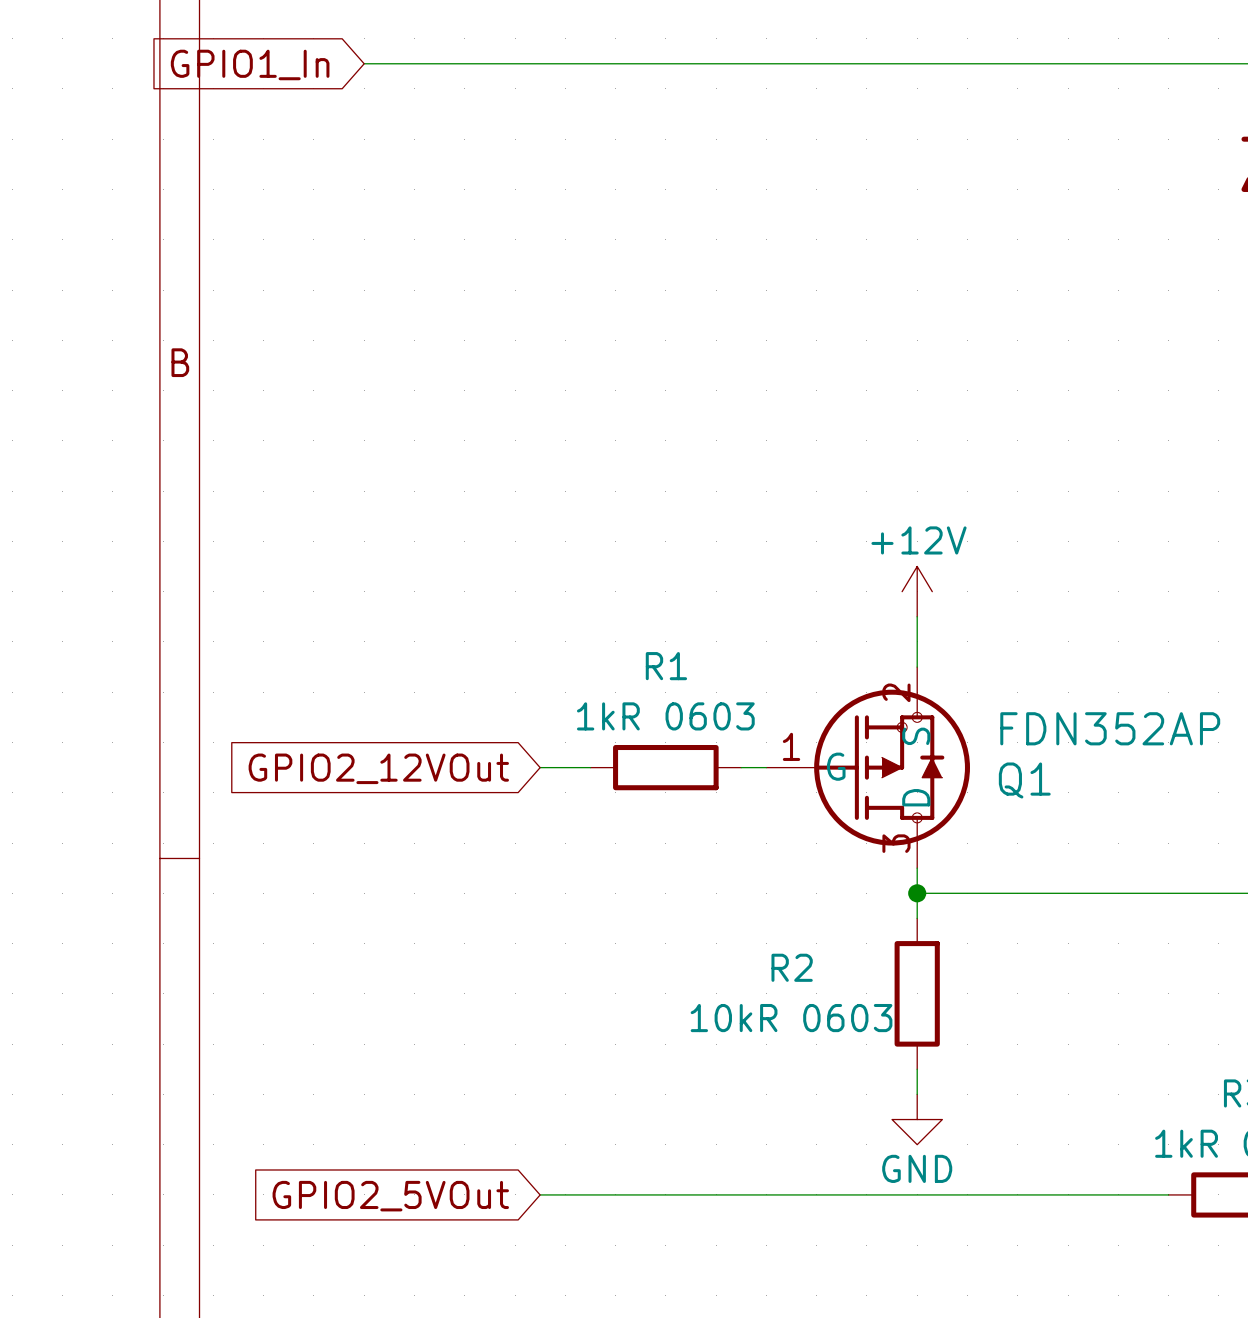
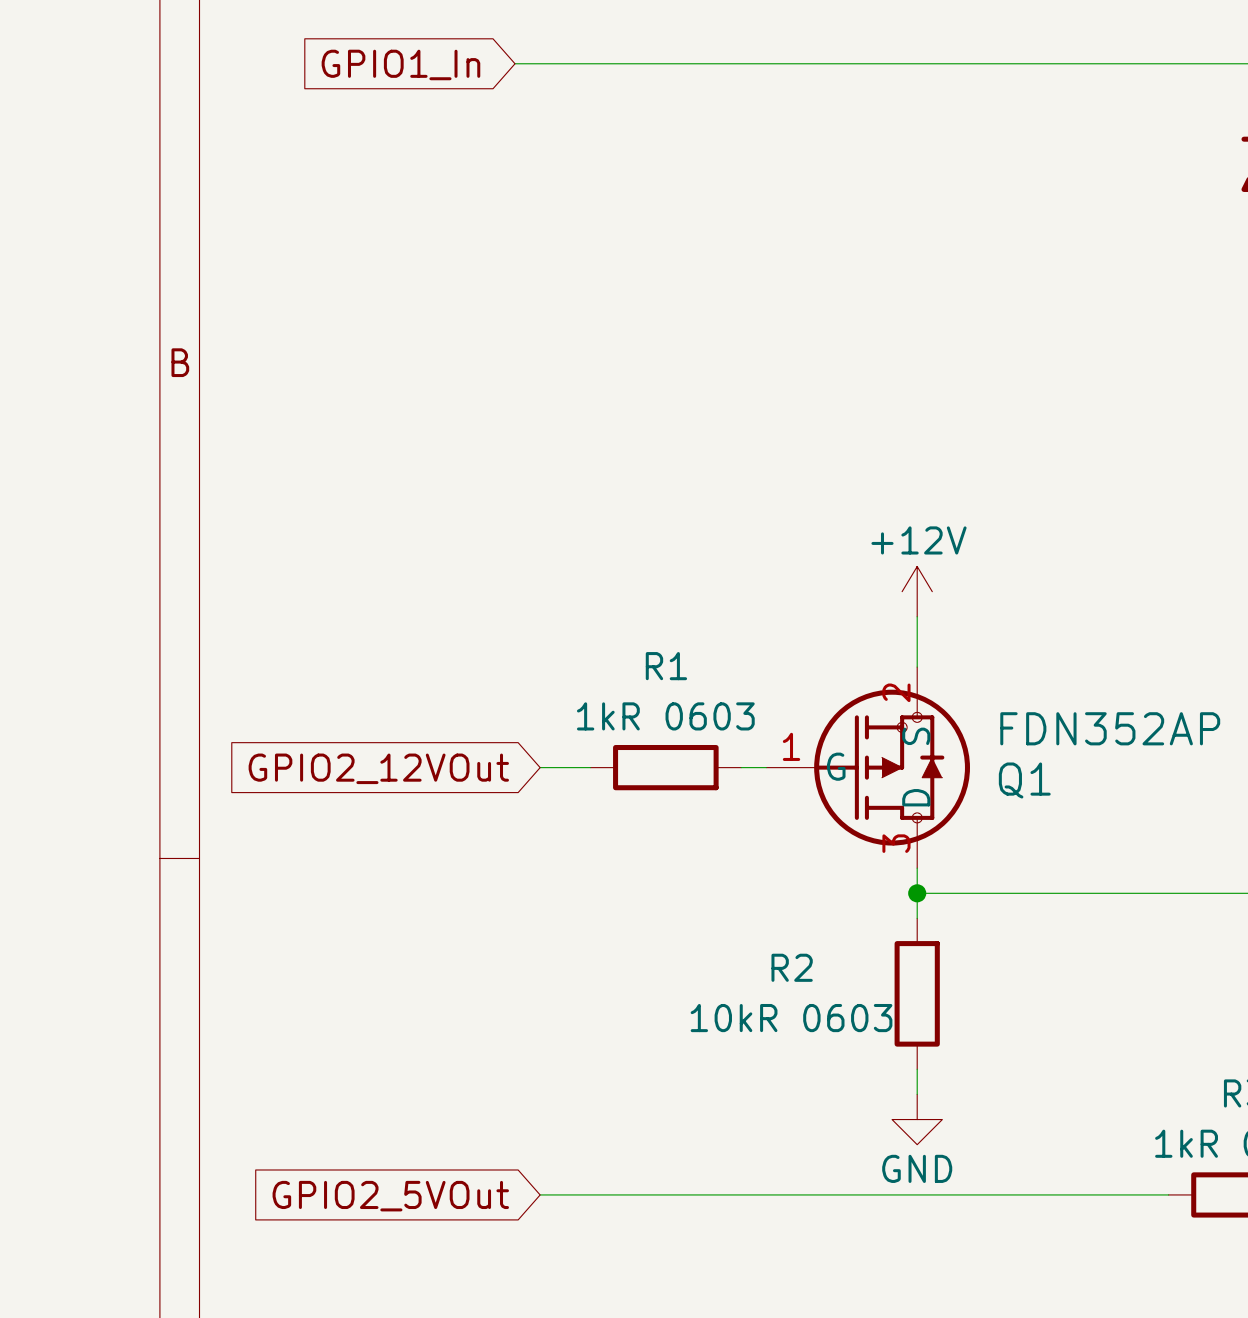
wire: (364, 63) (515, 63) -> none
global label position: GPIO1_In (250, 64) -> GPIO1_In (400, 64)

